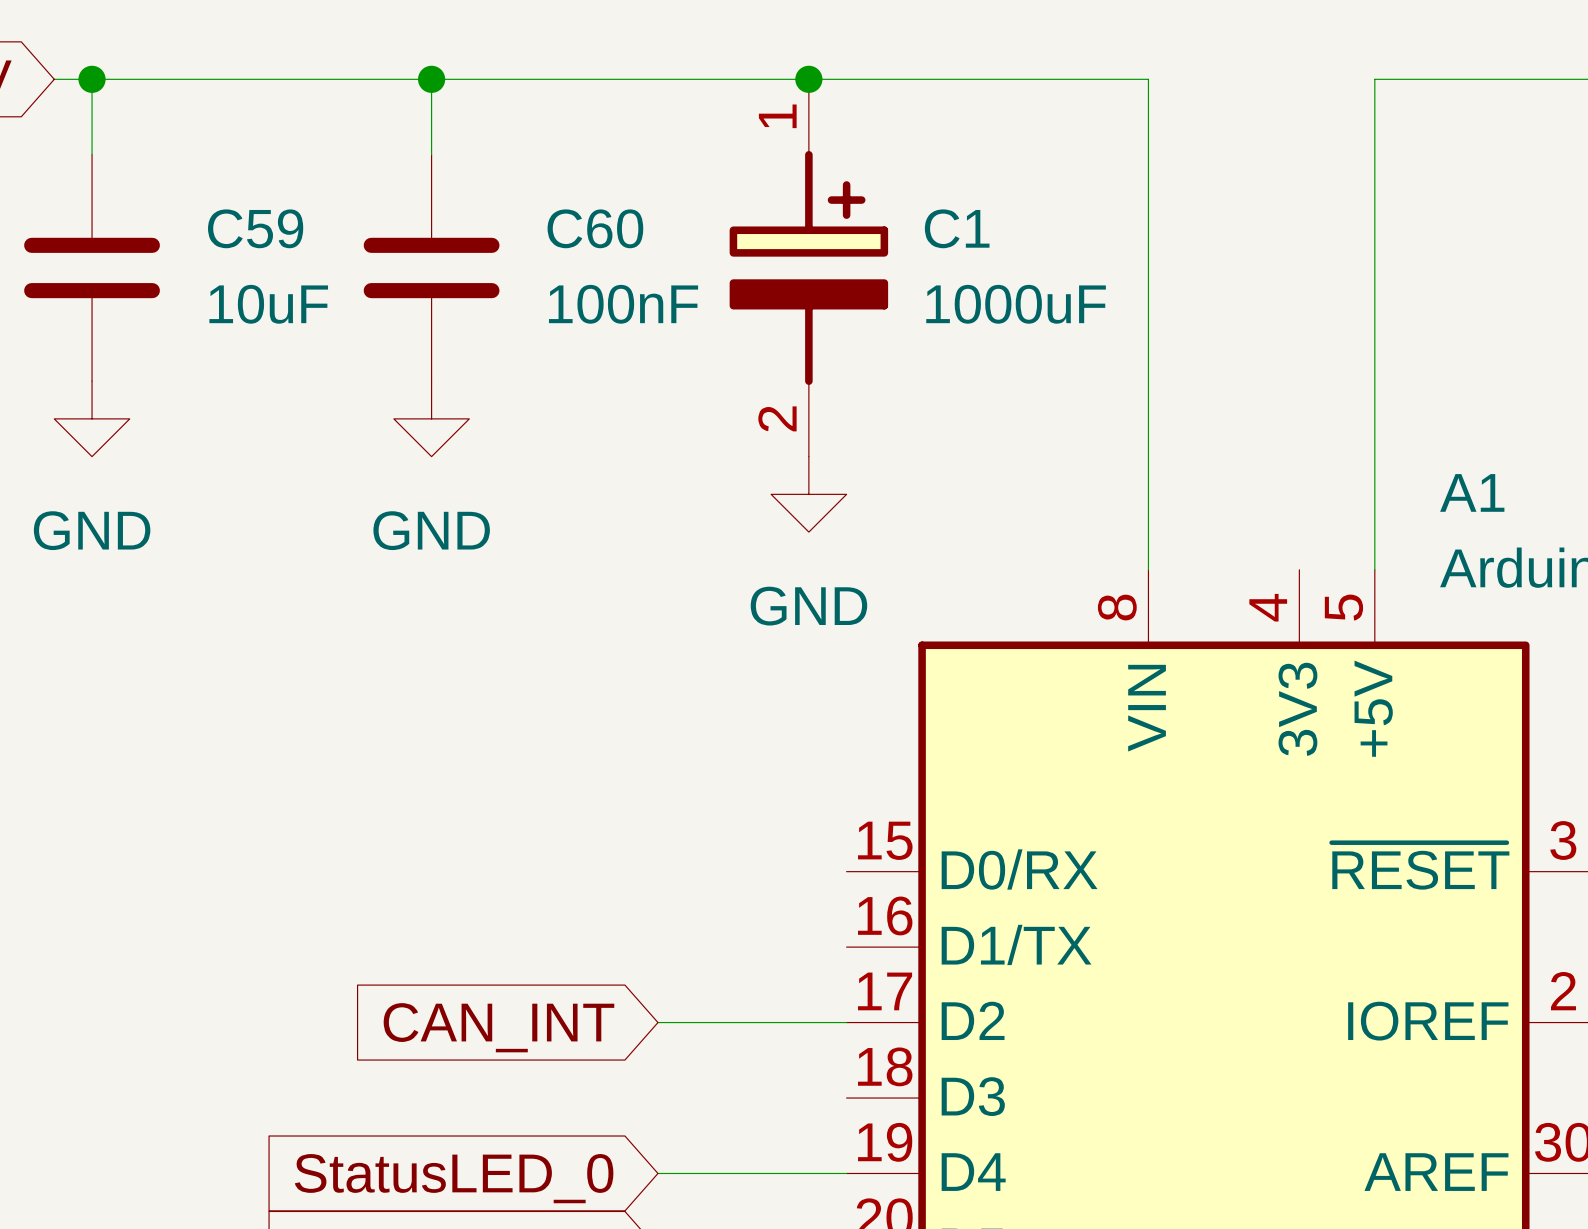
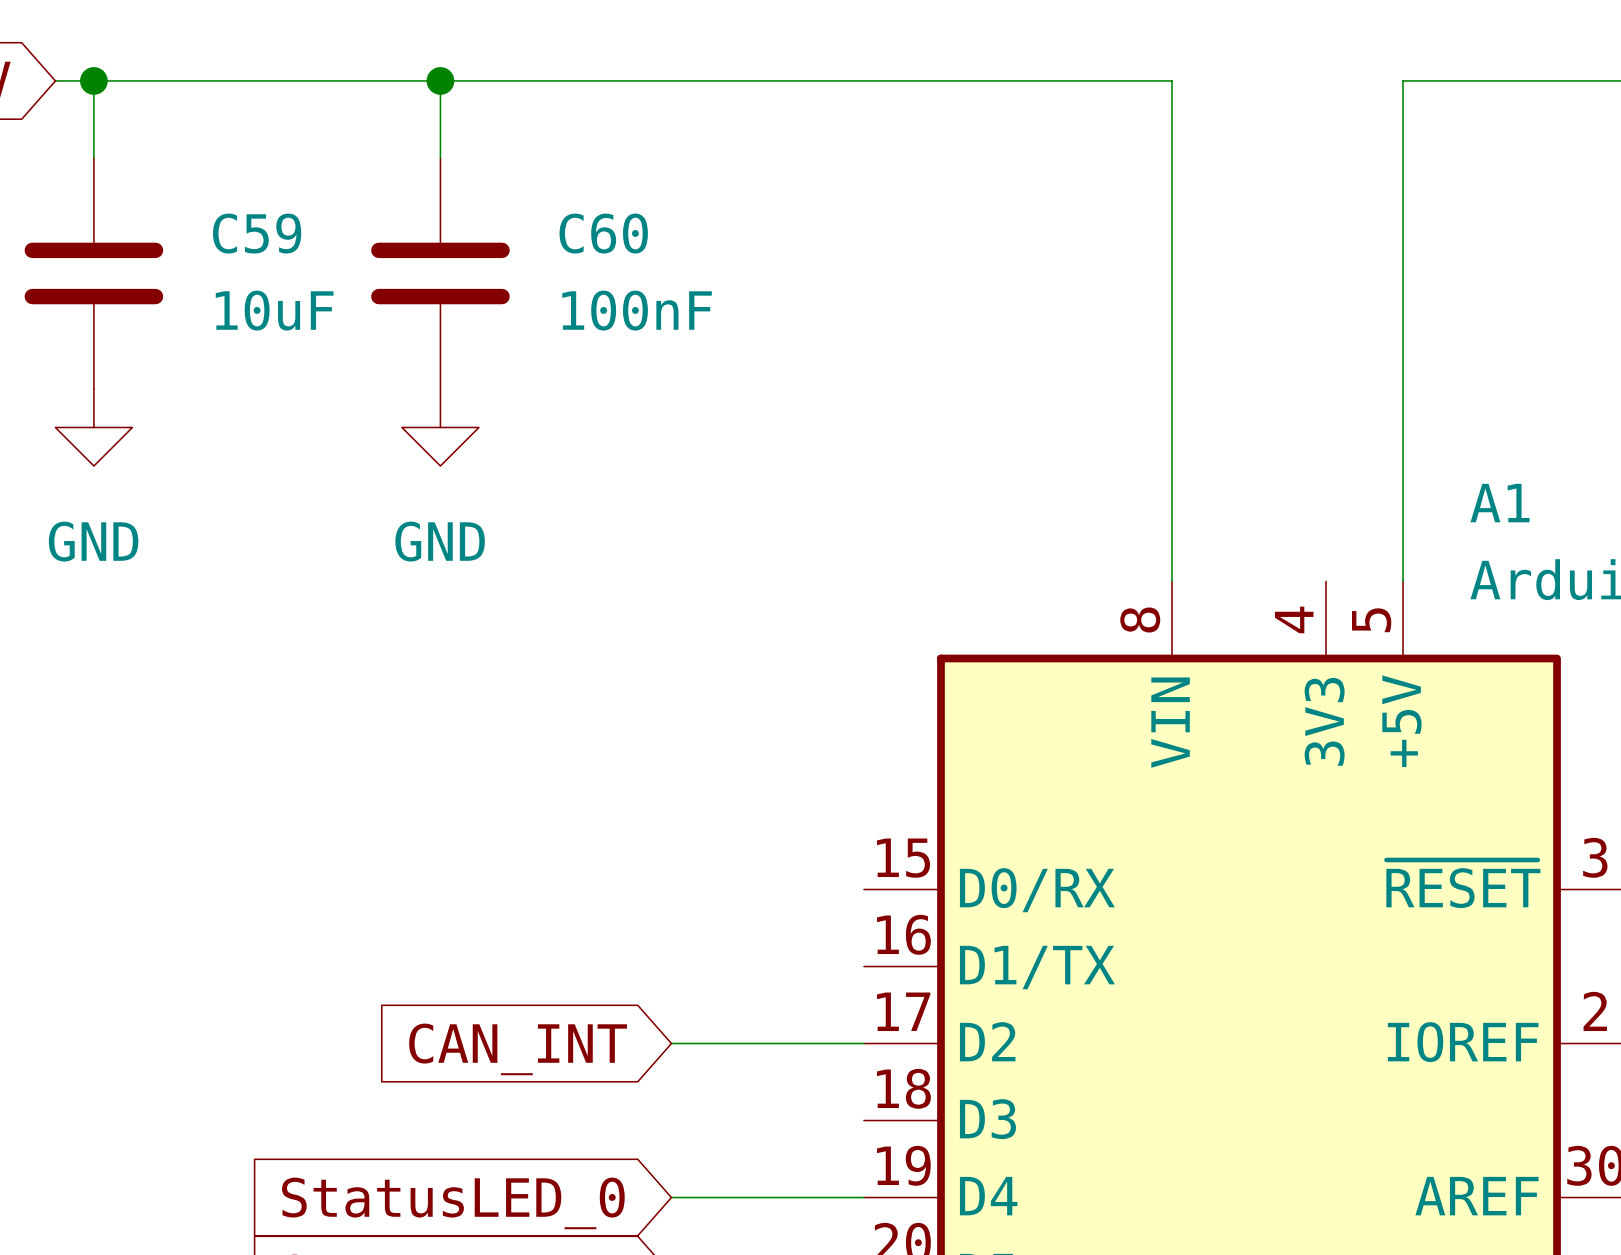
junction: (808, 79) -> none
C1: 1000uF (808, 267) -> none
power symbol: GND (808, 494) -> none

